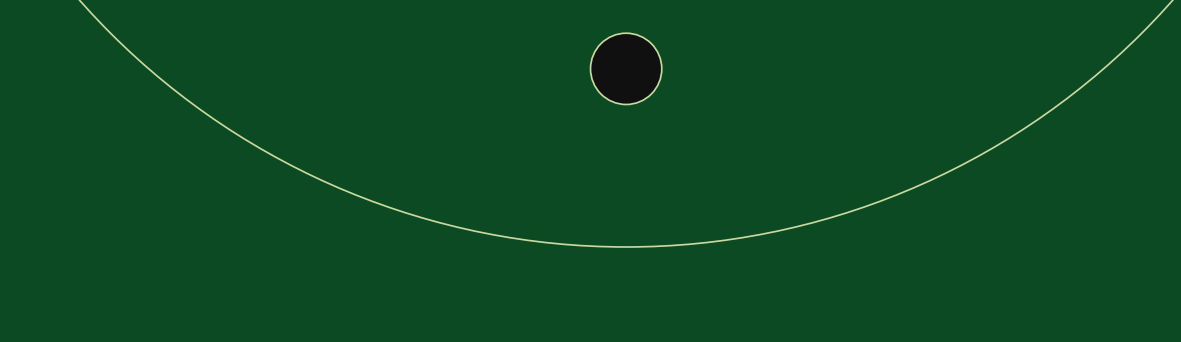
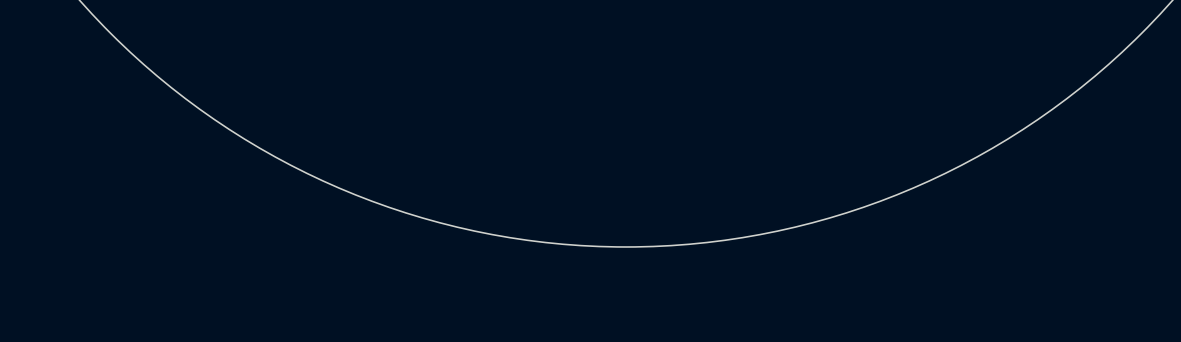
part: (626, 68) -> none

